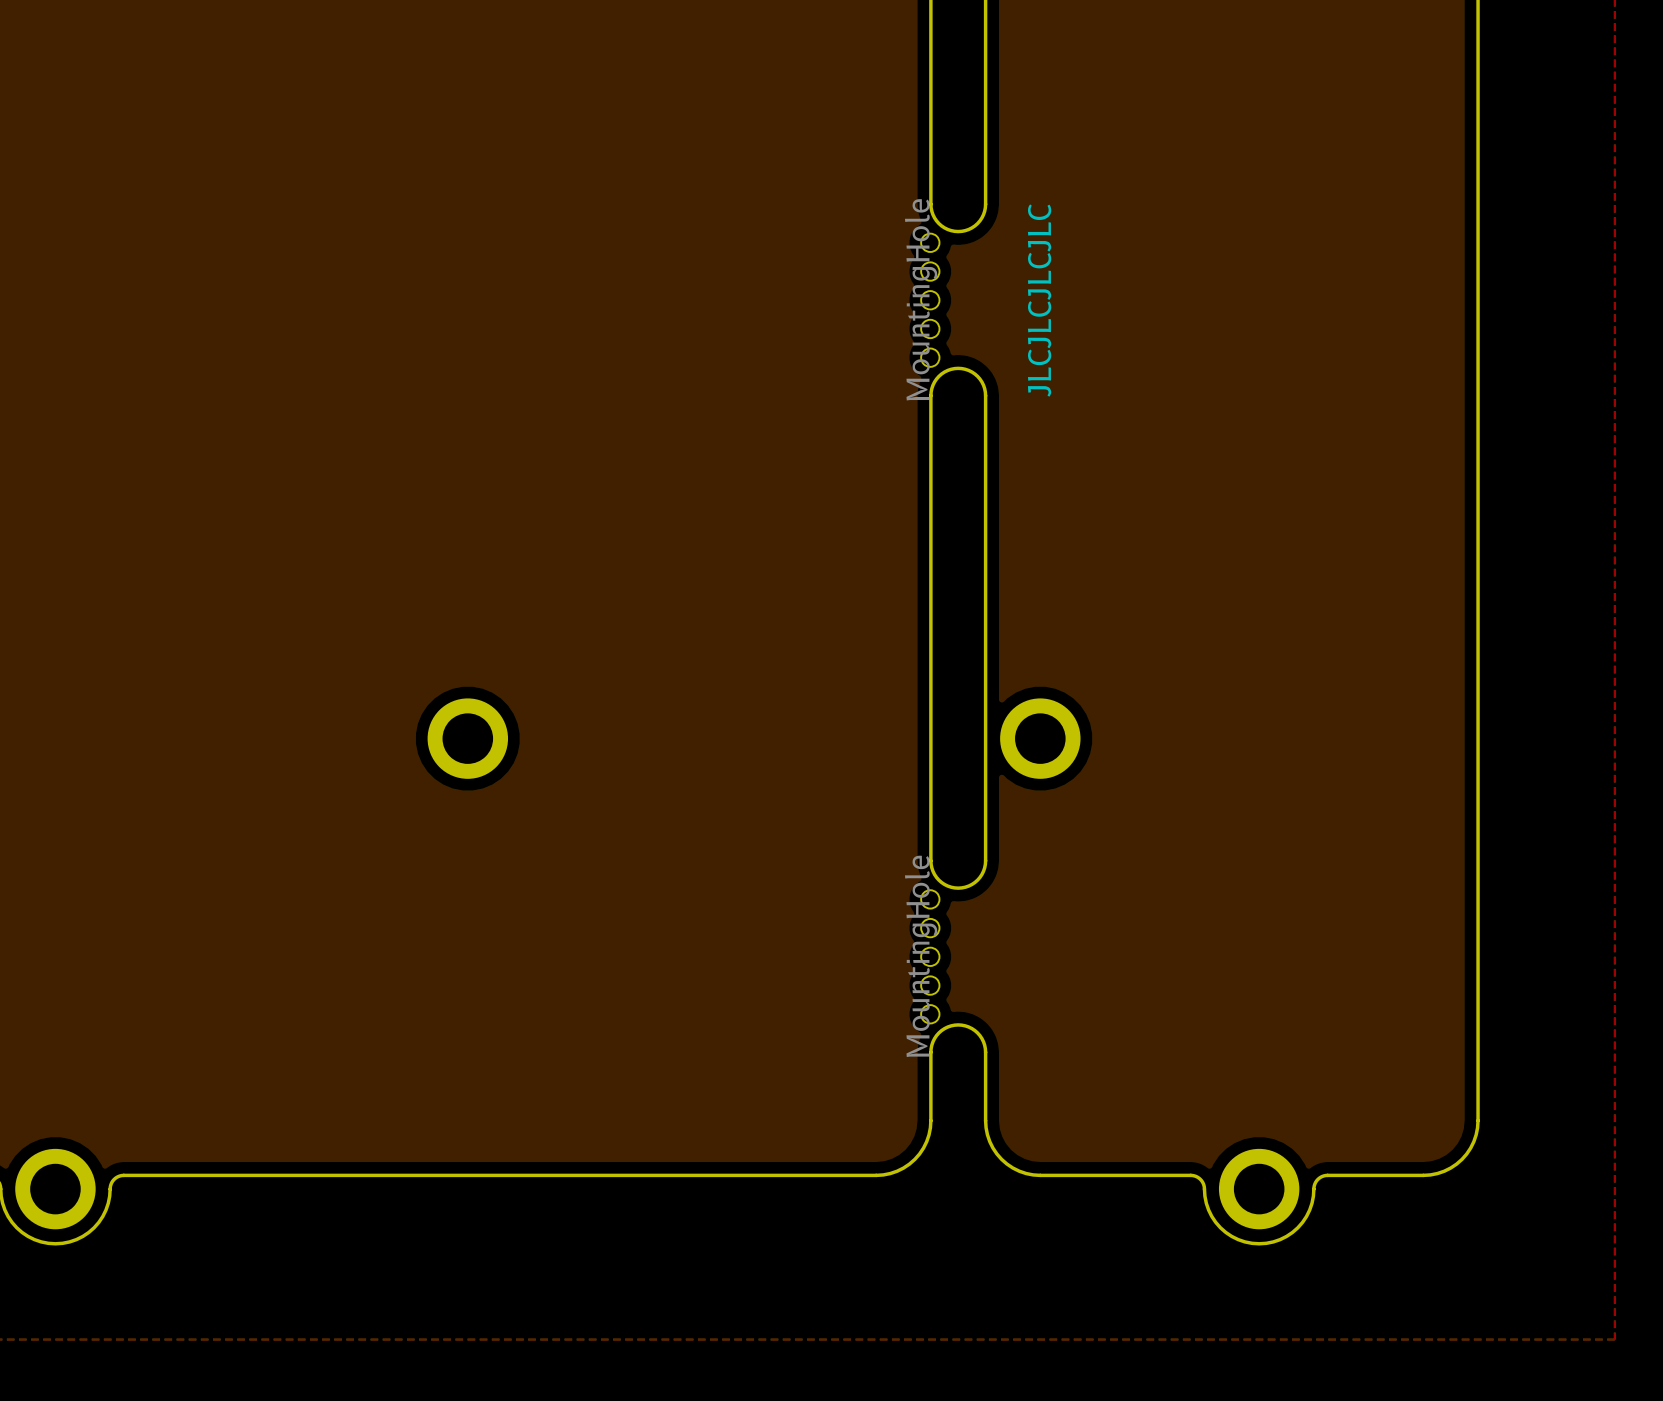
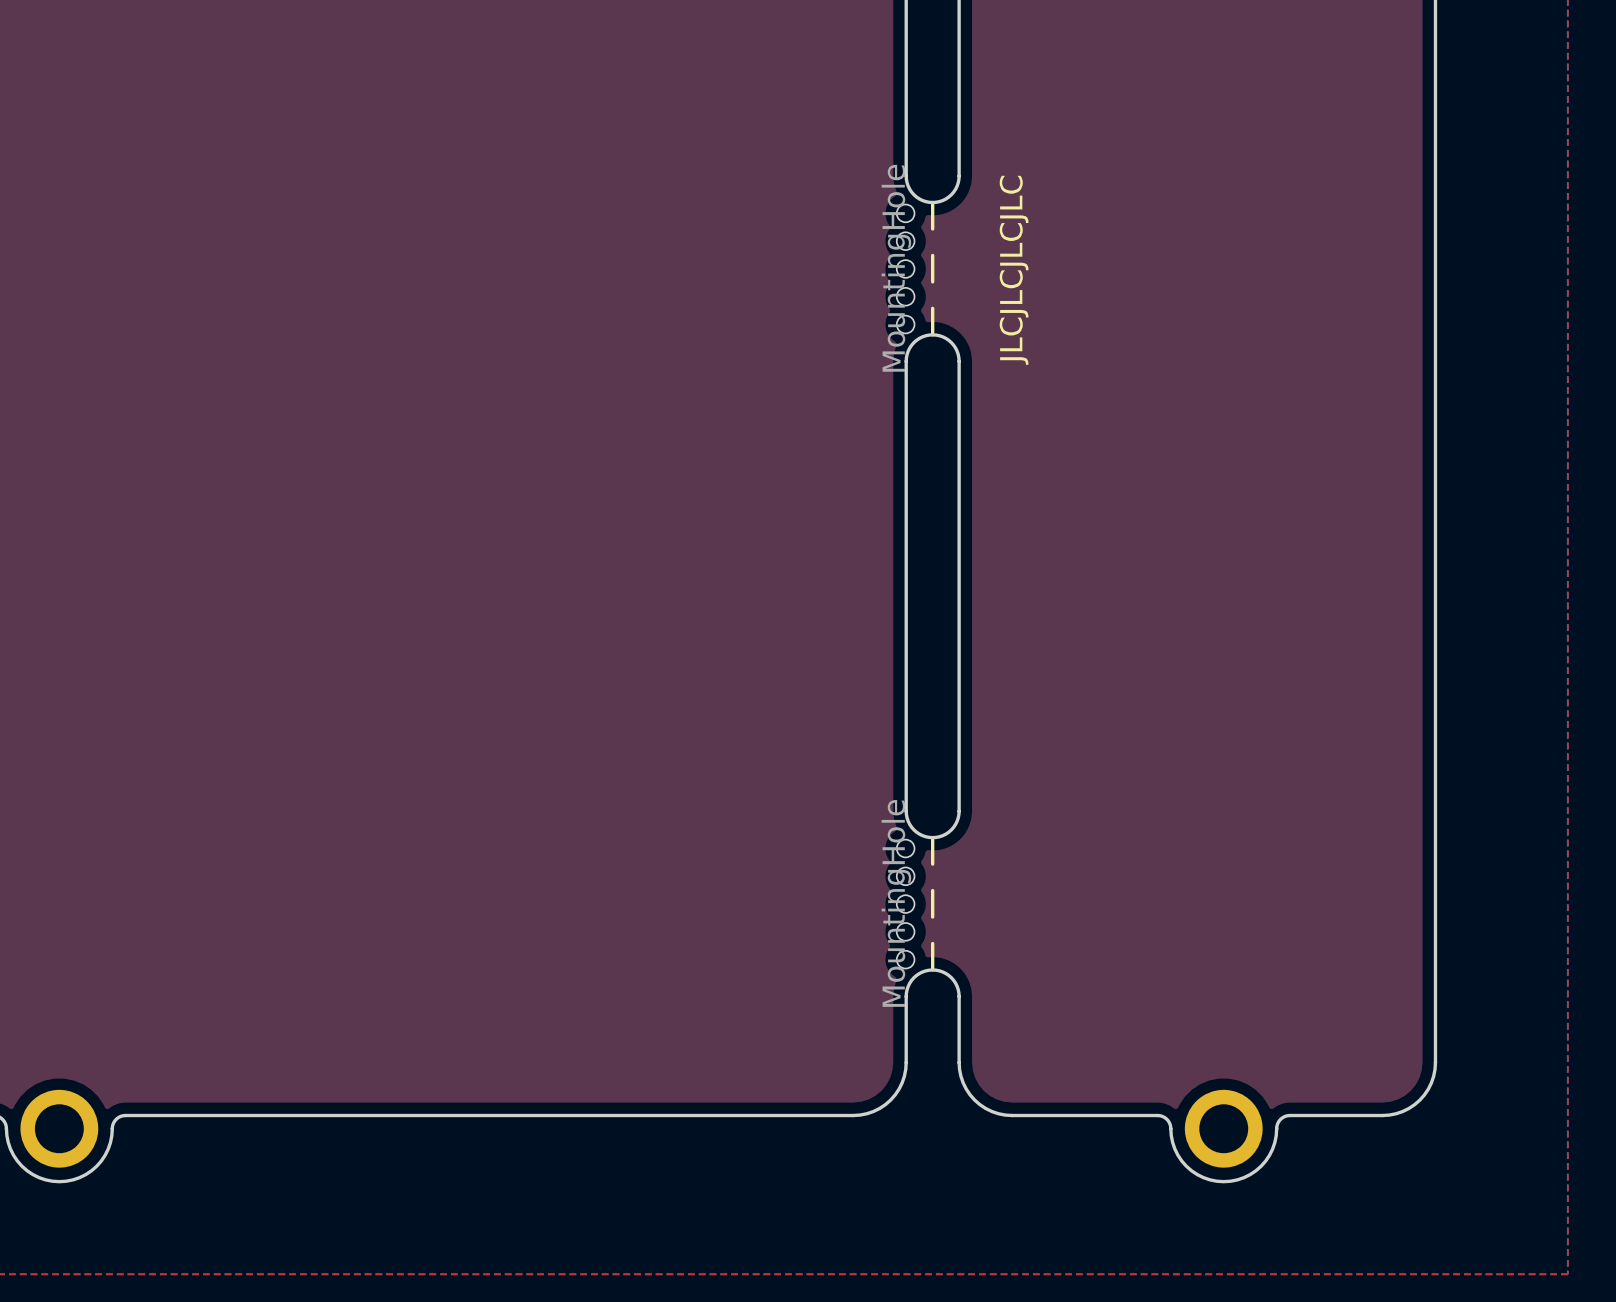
line: none -> (932, 202) (932, 228)
line: none -> (932, 255) (932, 281)
line: none -> (932, 308) (932, 334)
part: (467, 738) -> none
part: (1040, 738) -> none
line: none -> (932, 837) (932, 864)
line: none -> (932, 890) (932, 917)
line: none -> (932, 943) (932, 969)

